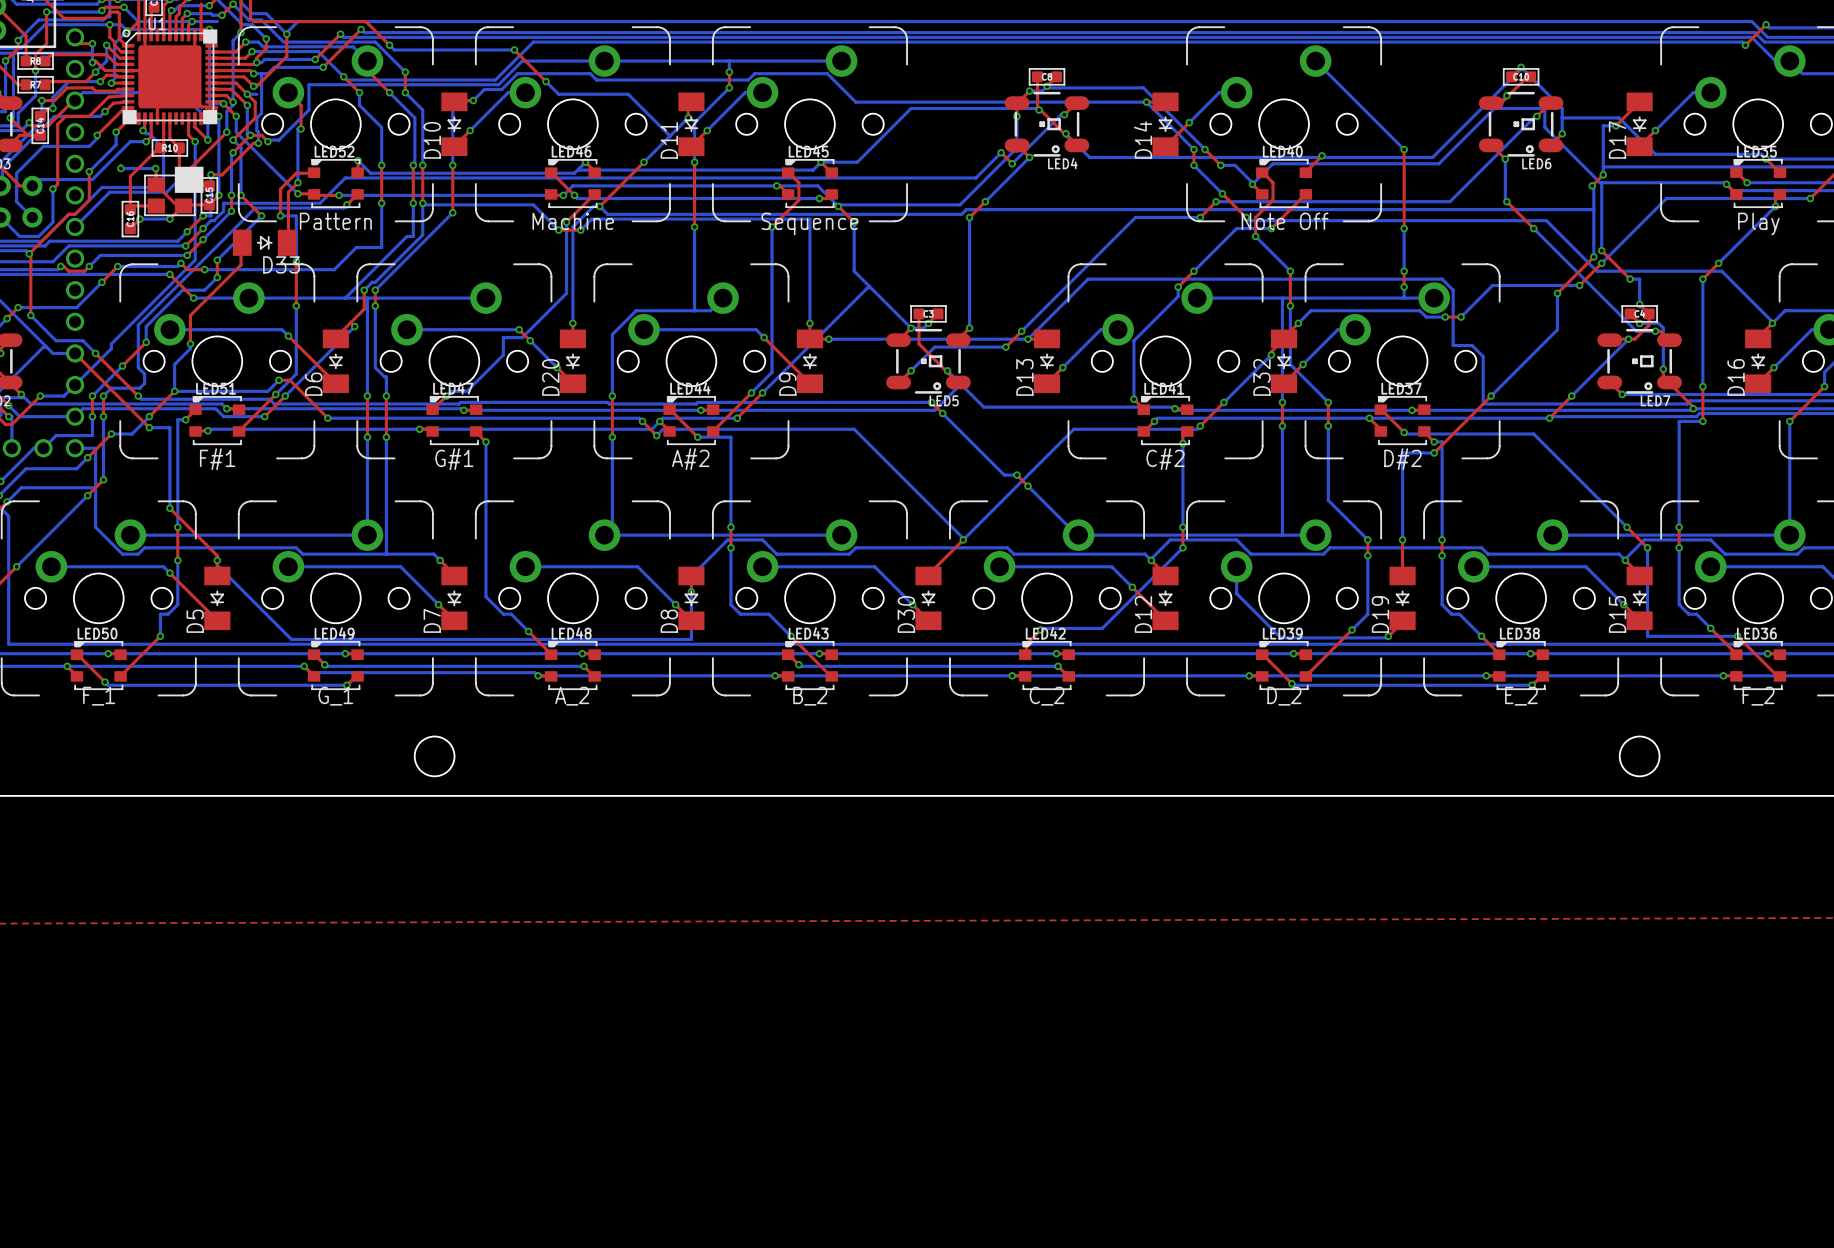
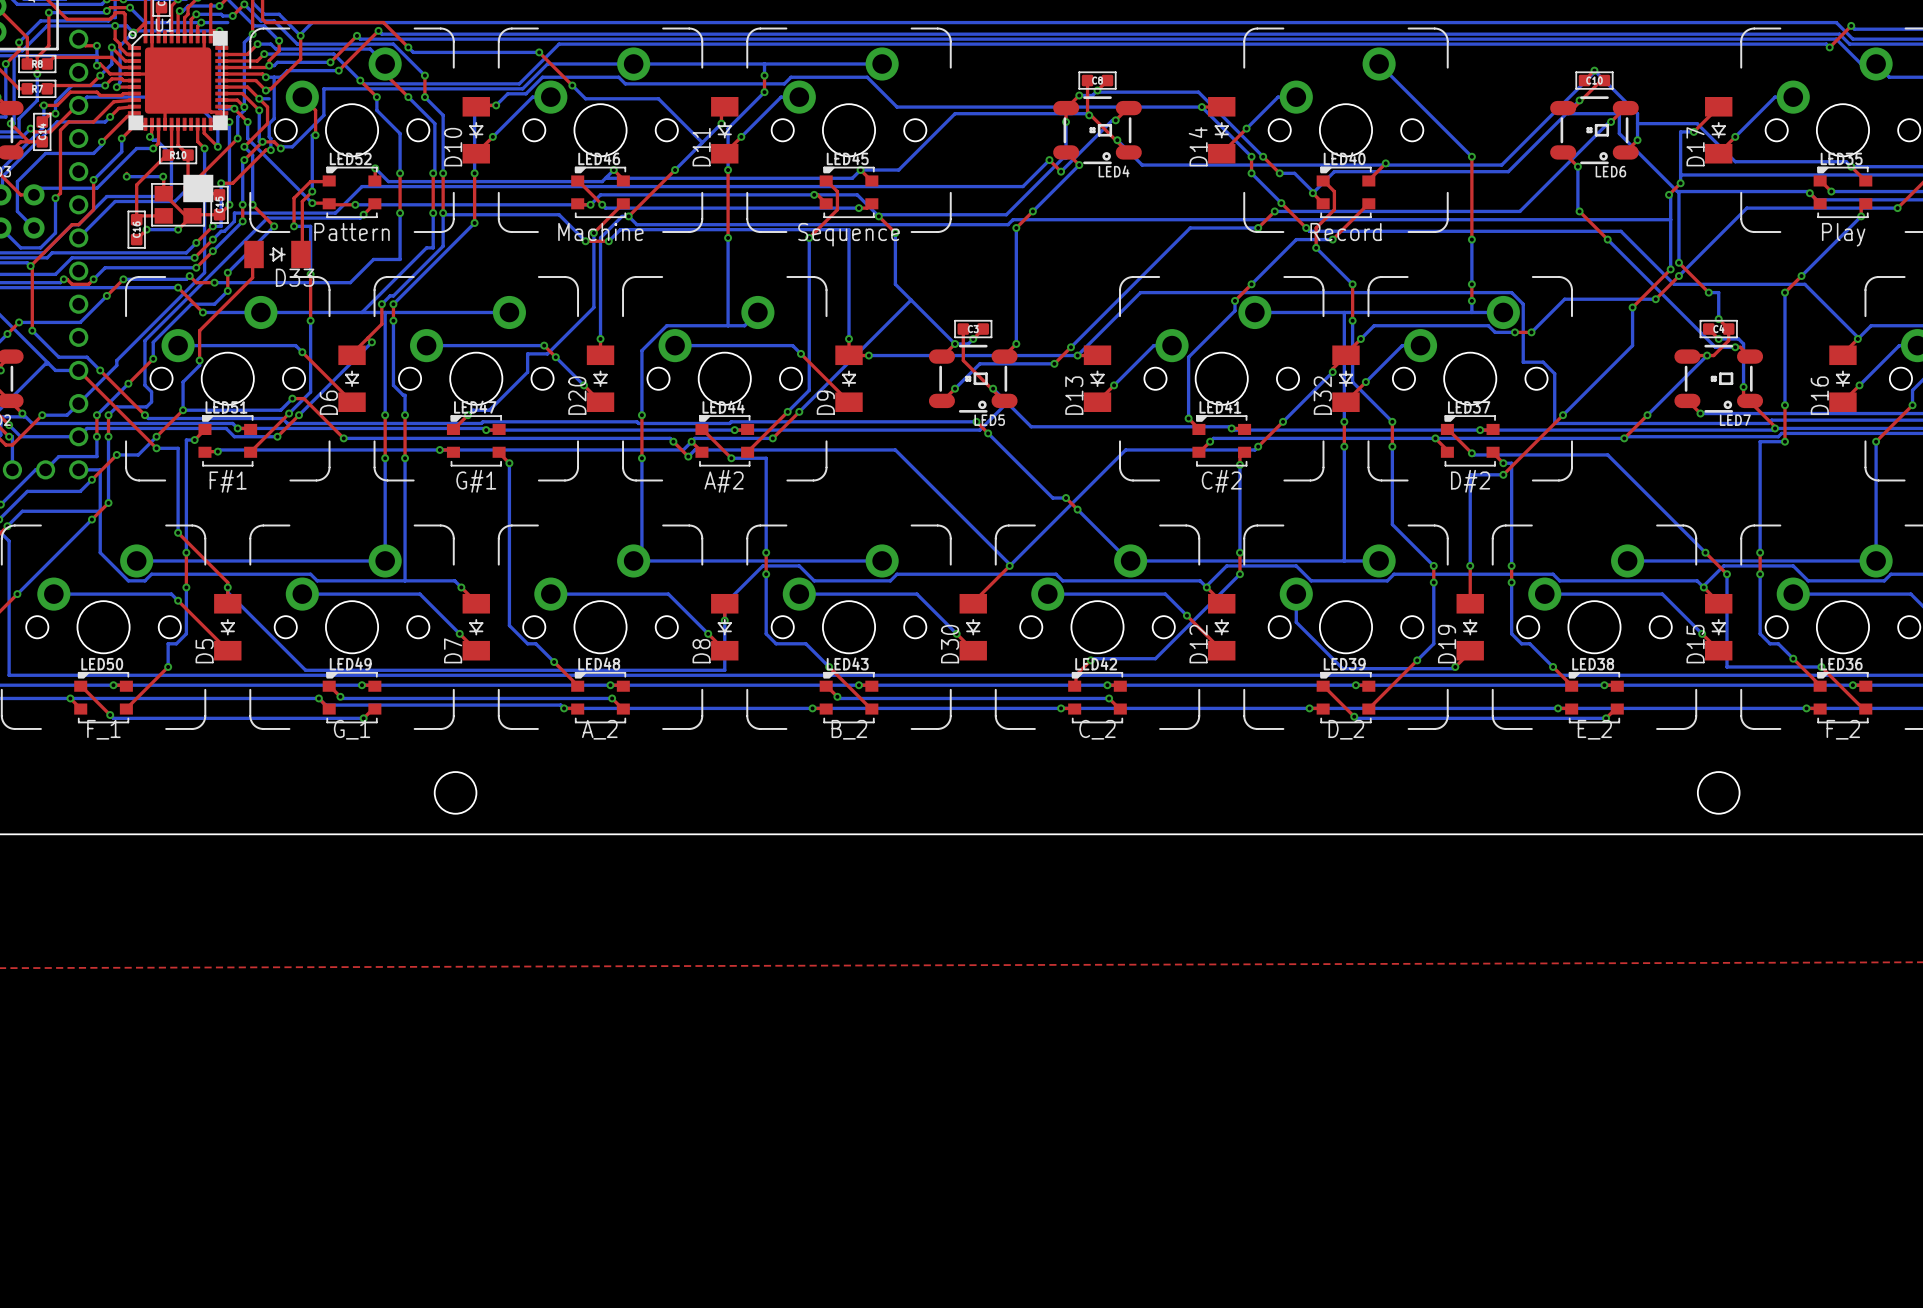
part value: Note Off (1285, 221) -> Record (1345, 232)

